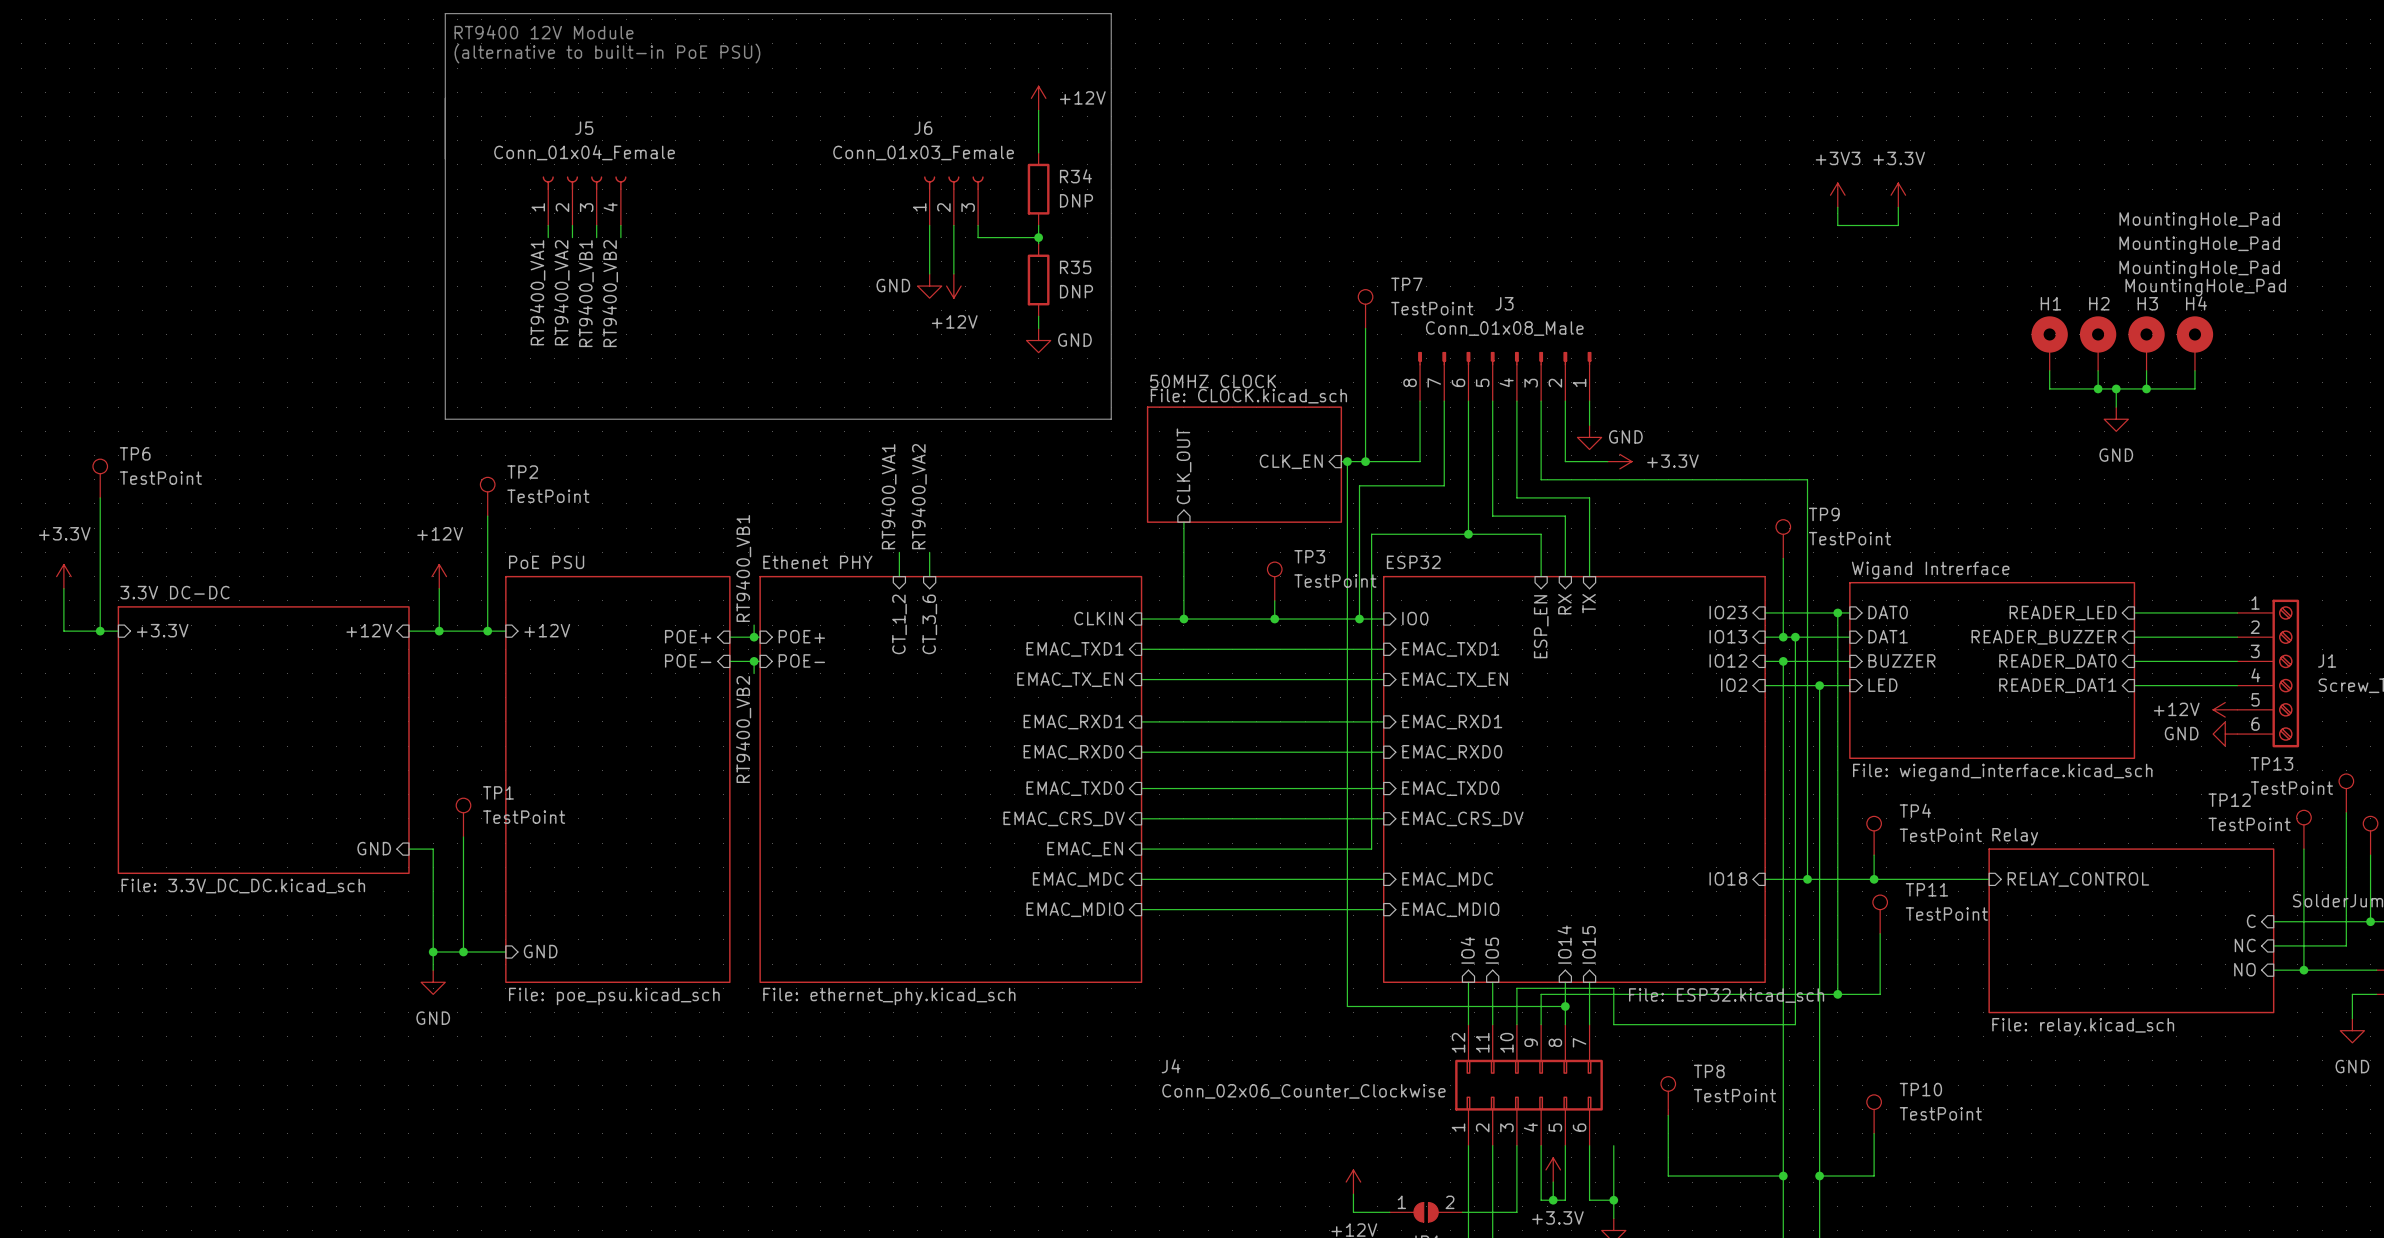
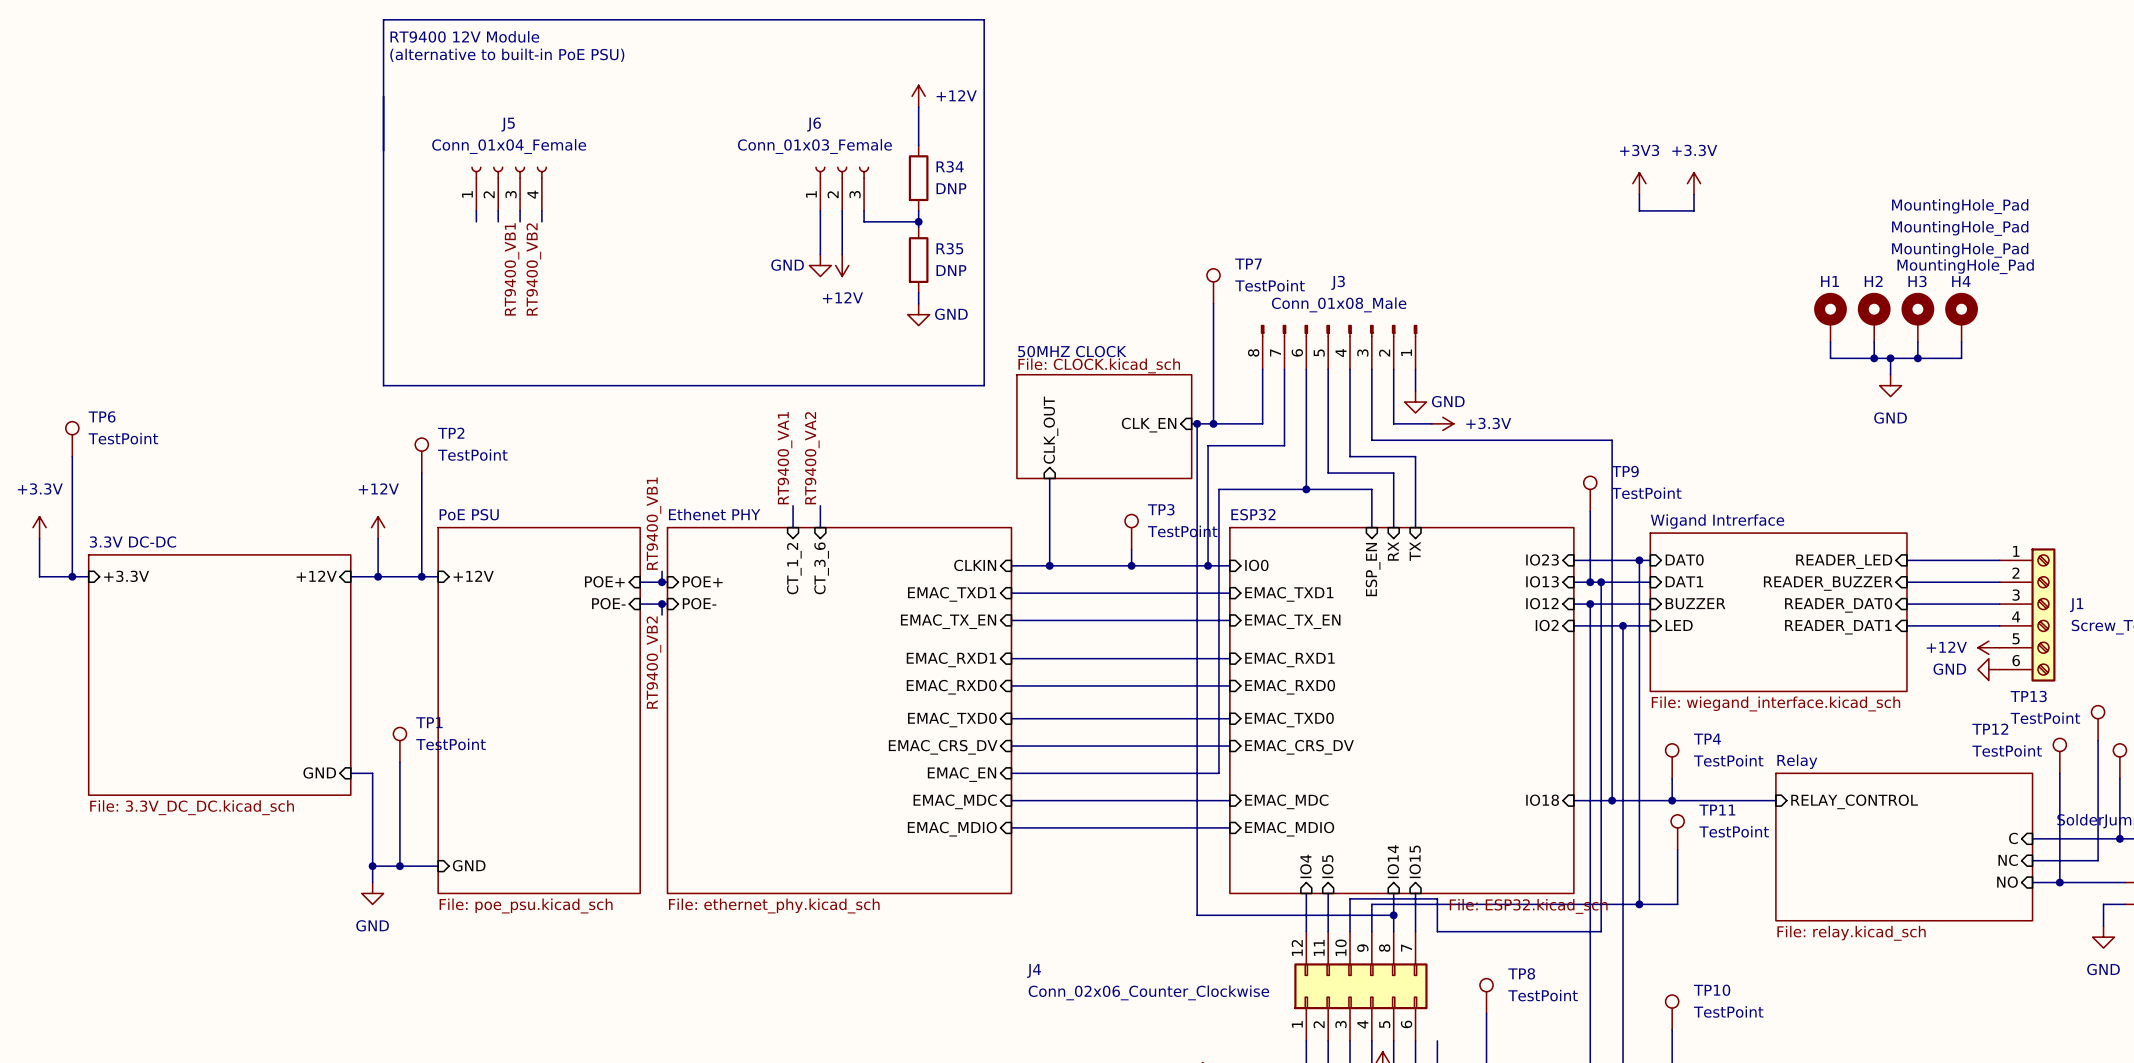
label: RT9400_VA1 (537, 292) -> none
label: RT9400_VA2 (561, 292) -> none

